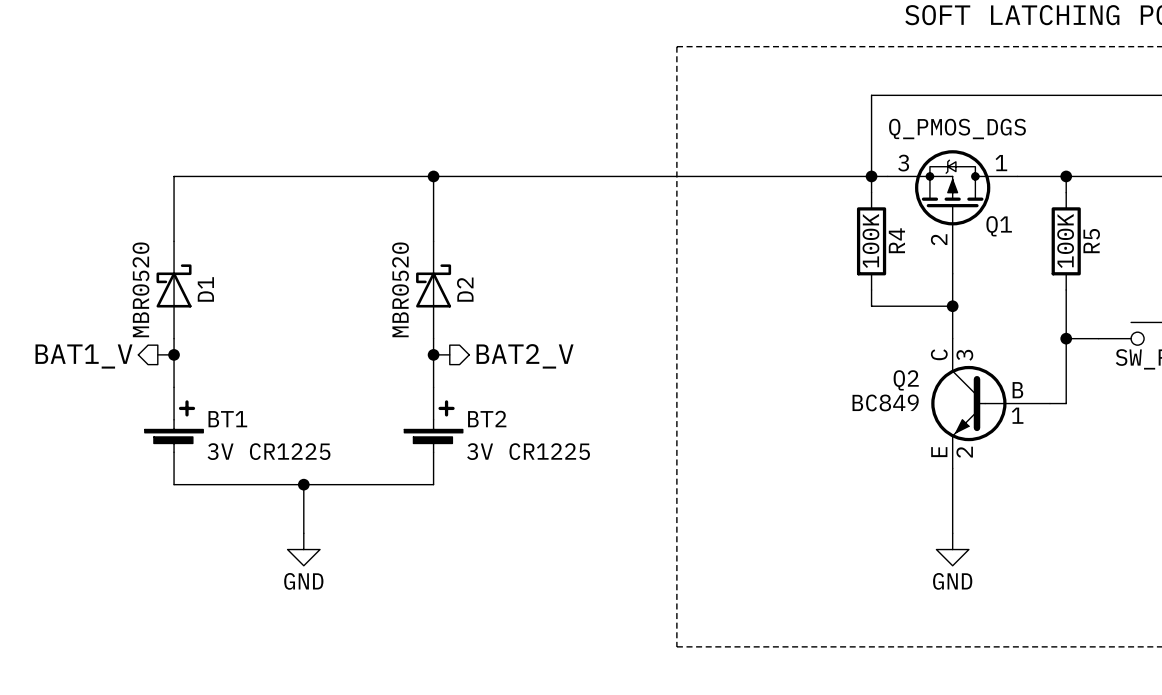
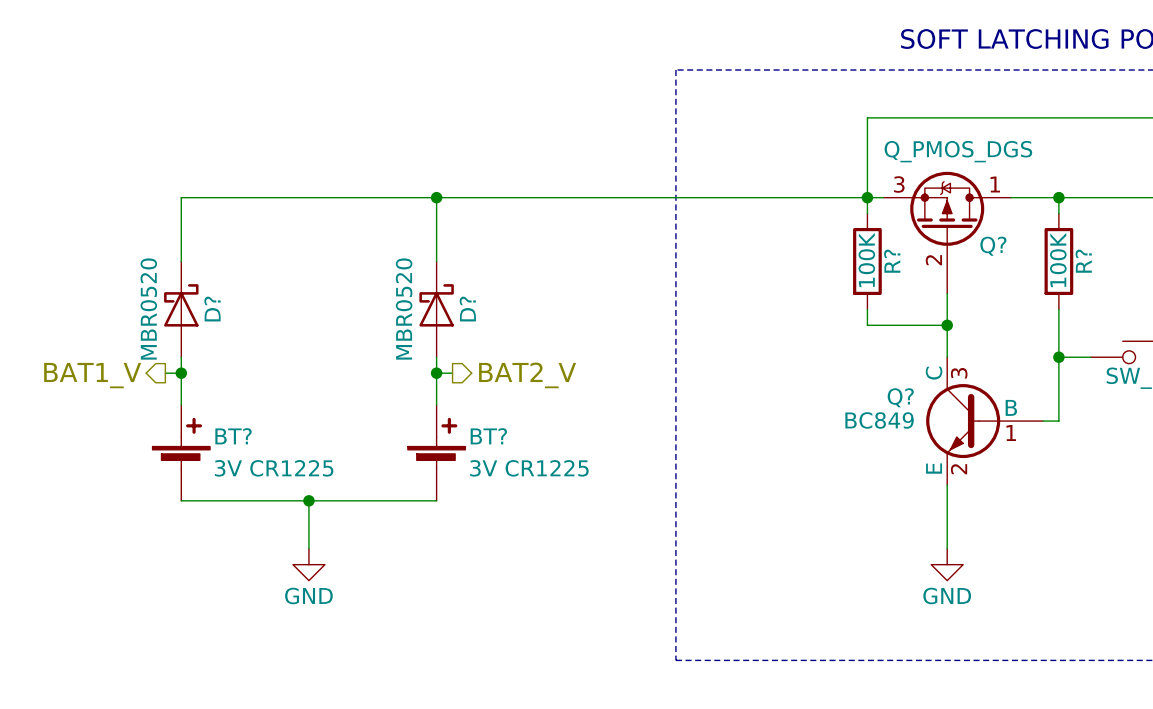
Q1 name: Q1 (999, 226) -> Q? (993, 246)
R4 name: R4 (896, 240) -> R? (892, 261)
R5 name: R5 (1091, 241) -> R? (1083, 261)
D1 name: D1 (205, 289) -> D? (212, 309)
D2 name: D2 (465, 289) -> D? (467, 309)
Q2 name: Q2 (906, 380) -> Q? (900, 397)
BT1 name: BT1 (227, 419) -> BT? (233, 436)
BT2 name: BT2 (487, 419) -> BT? (488, 436)

